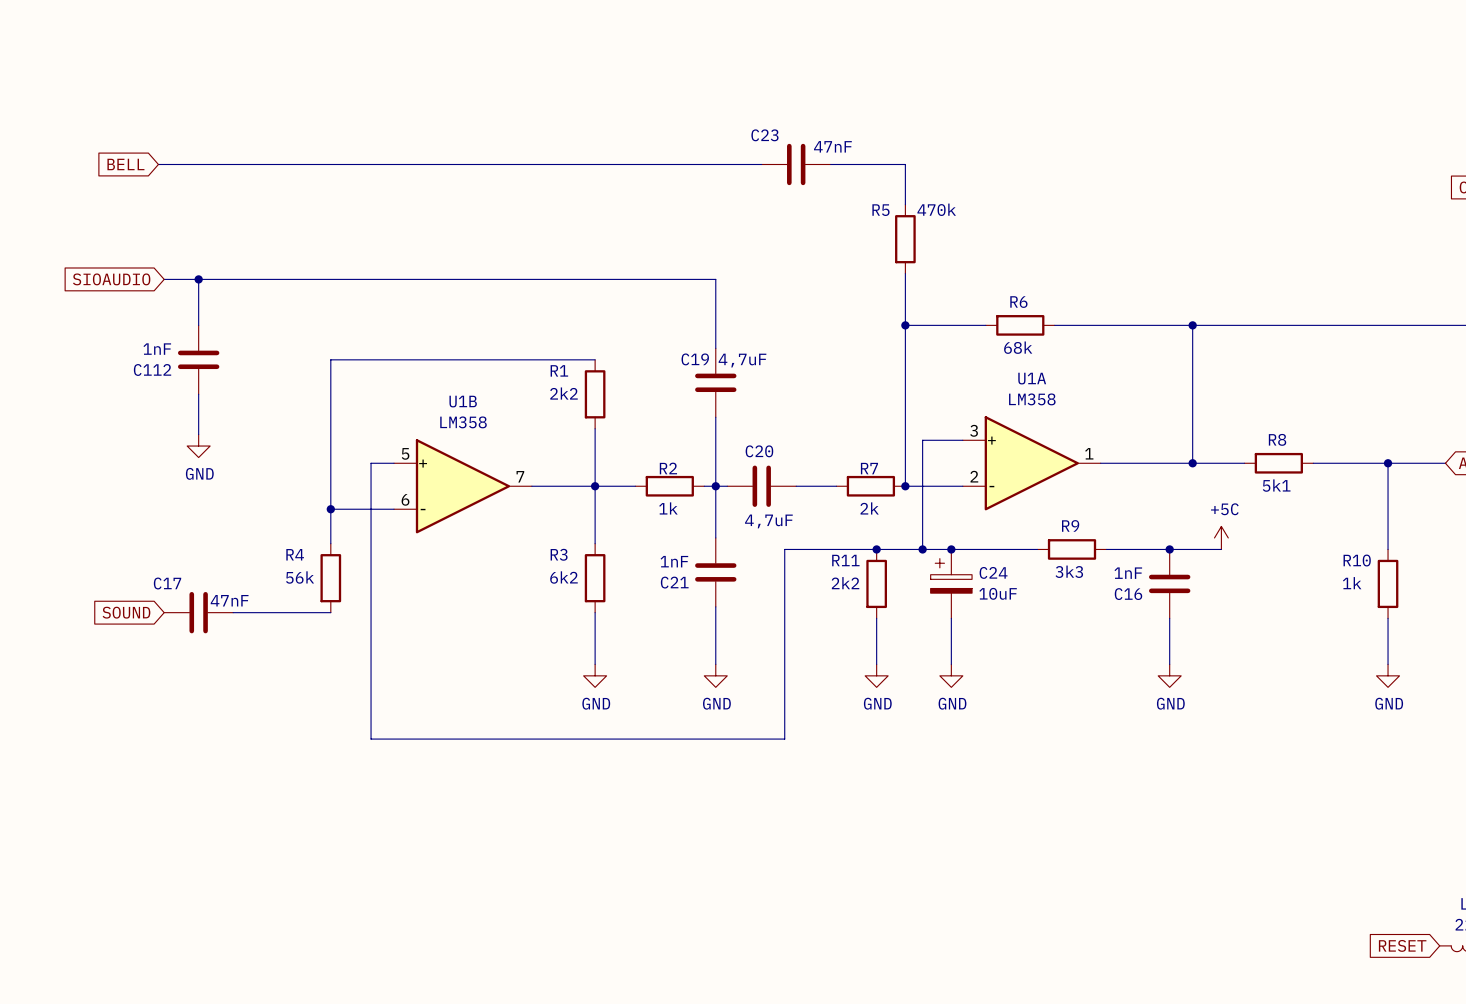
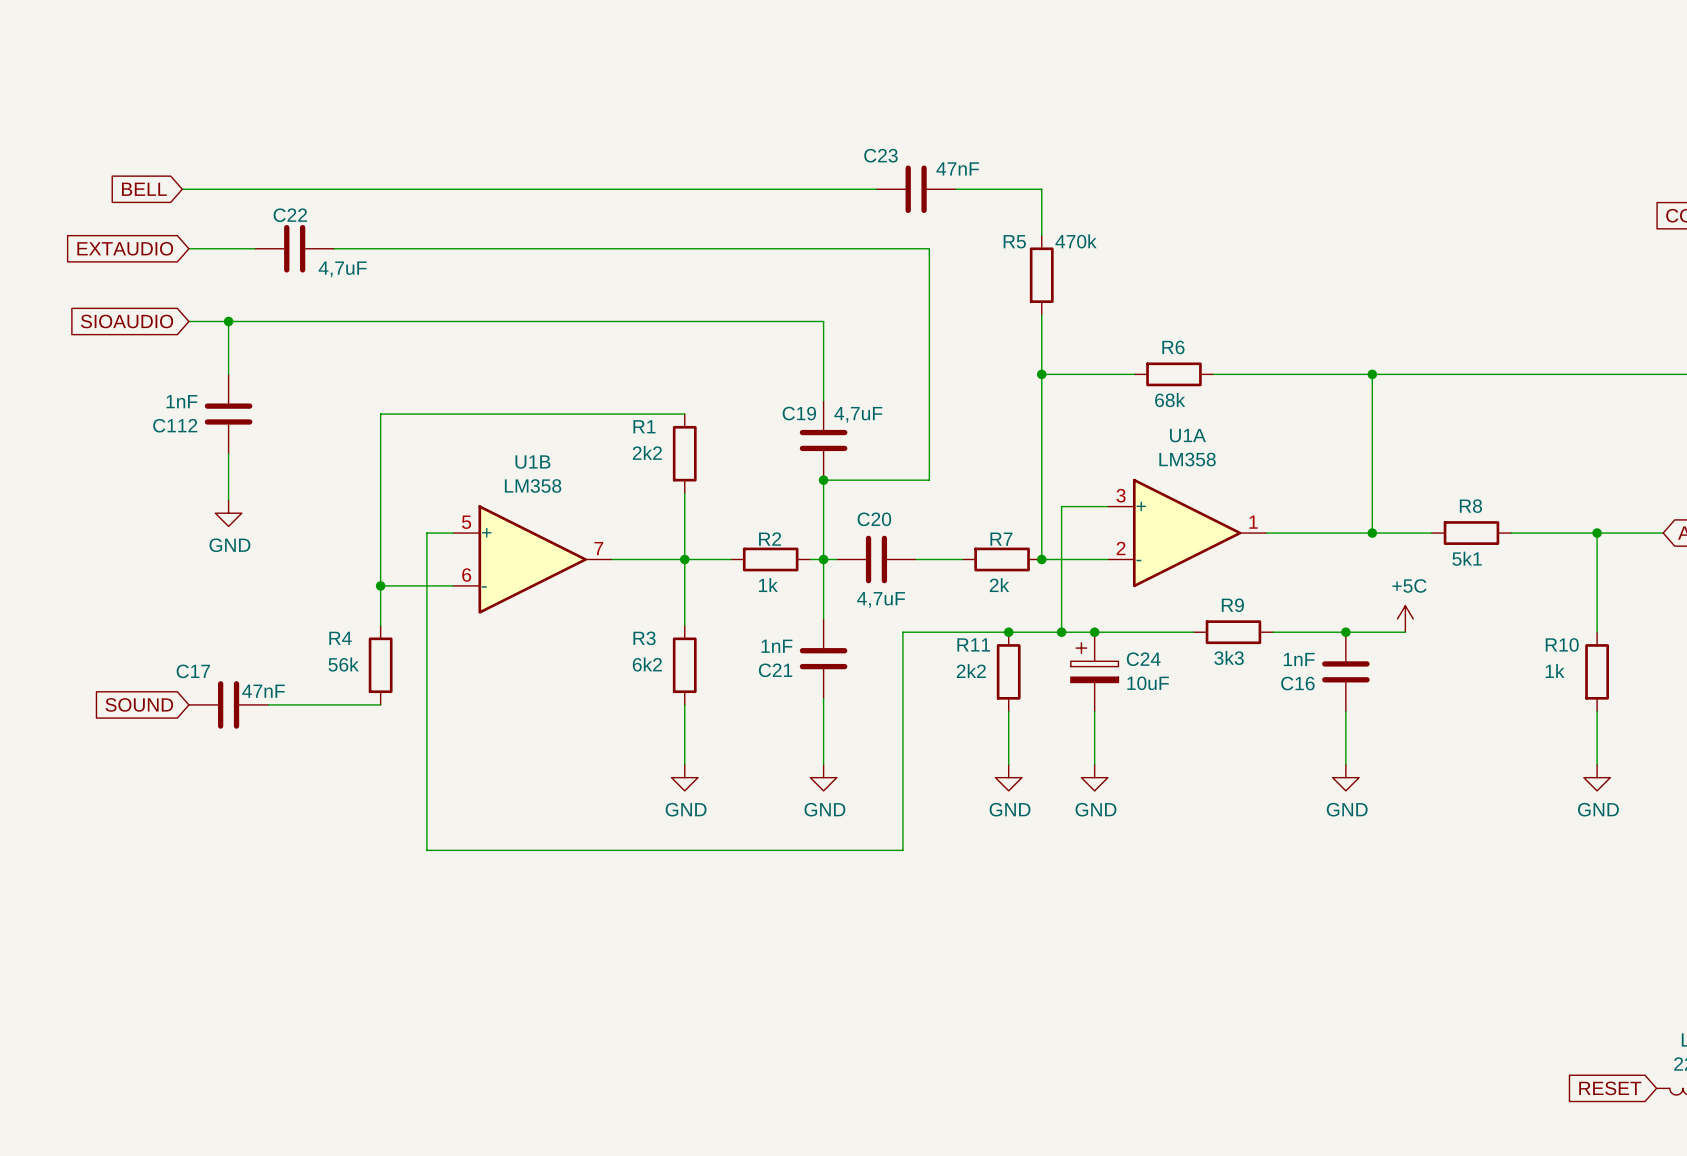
global label: none -> EXTAUDIO (125, 248)
wire: none -> (188, 248) (255, 248)
C22: none -> 4,7uF (294, 248)
wire: none -> (334, 248) (929, 248) (929, 480) (823, 480)
junction: none -> (823, 480)

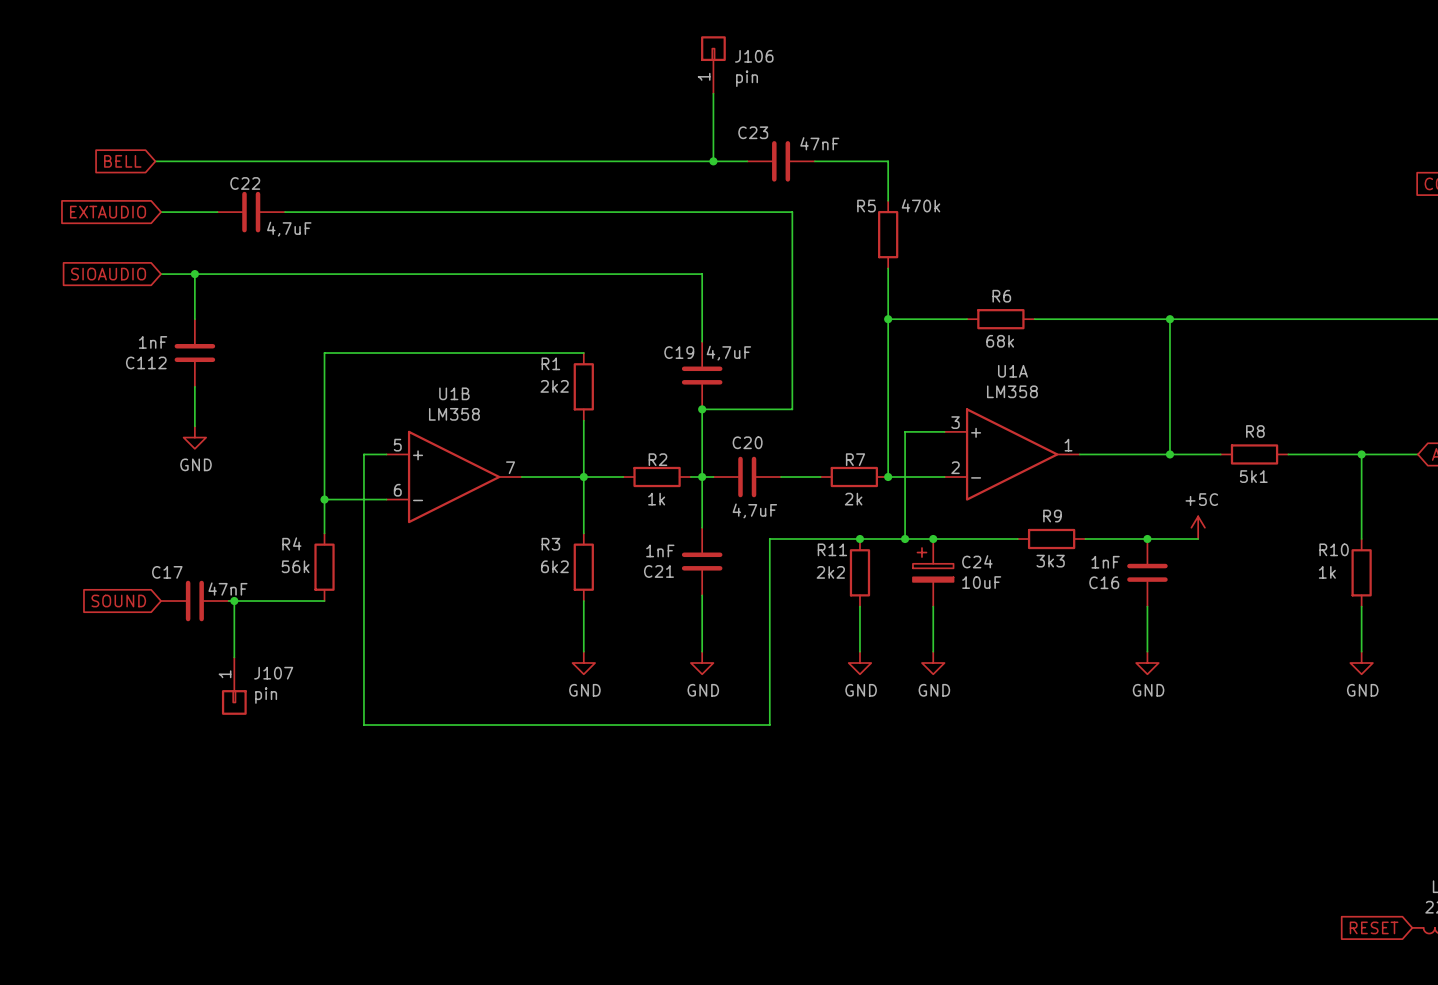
J106: none -> pin (713, 64)
wire: none -> (713, 93) (713, 161)
junction: none -> (713, 161)
wire: none -> (234, 601) (234, 657)
junction: none -> (234, 601)
J107: none -> pin (234, 686)

